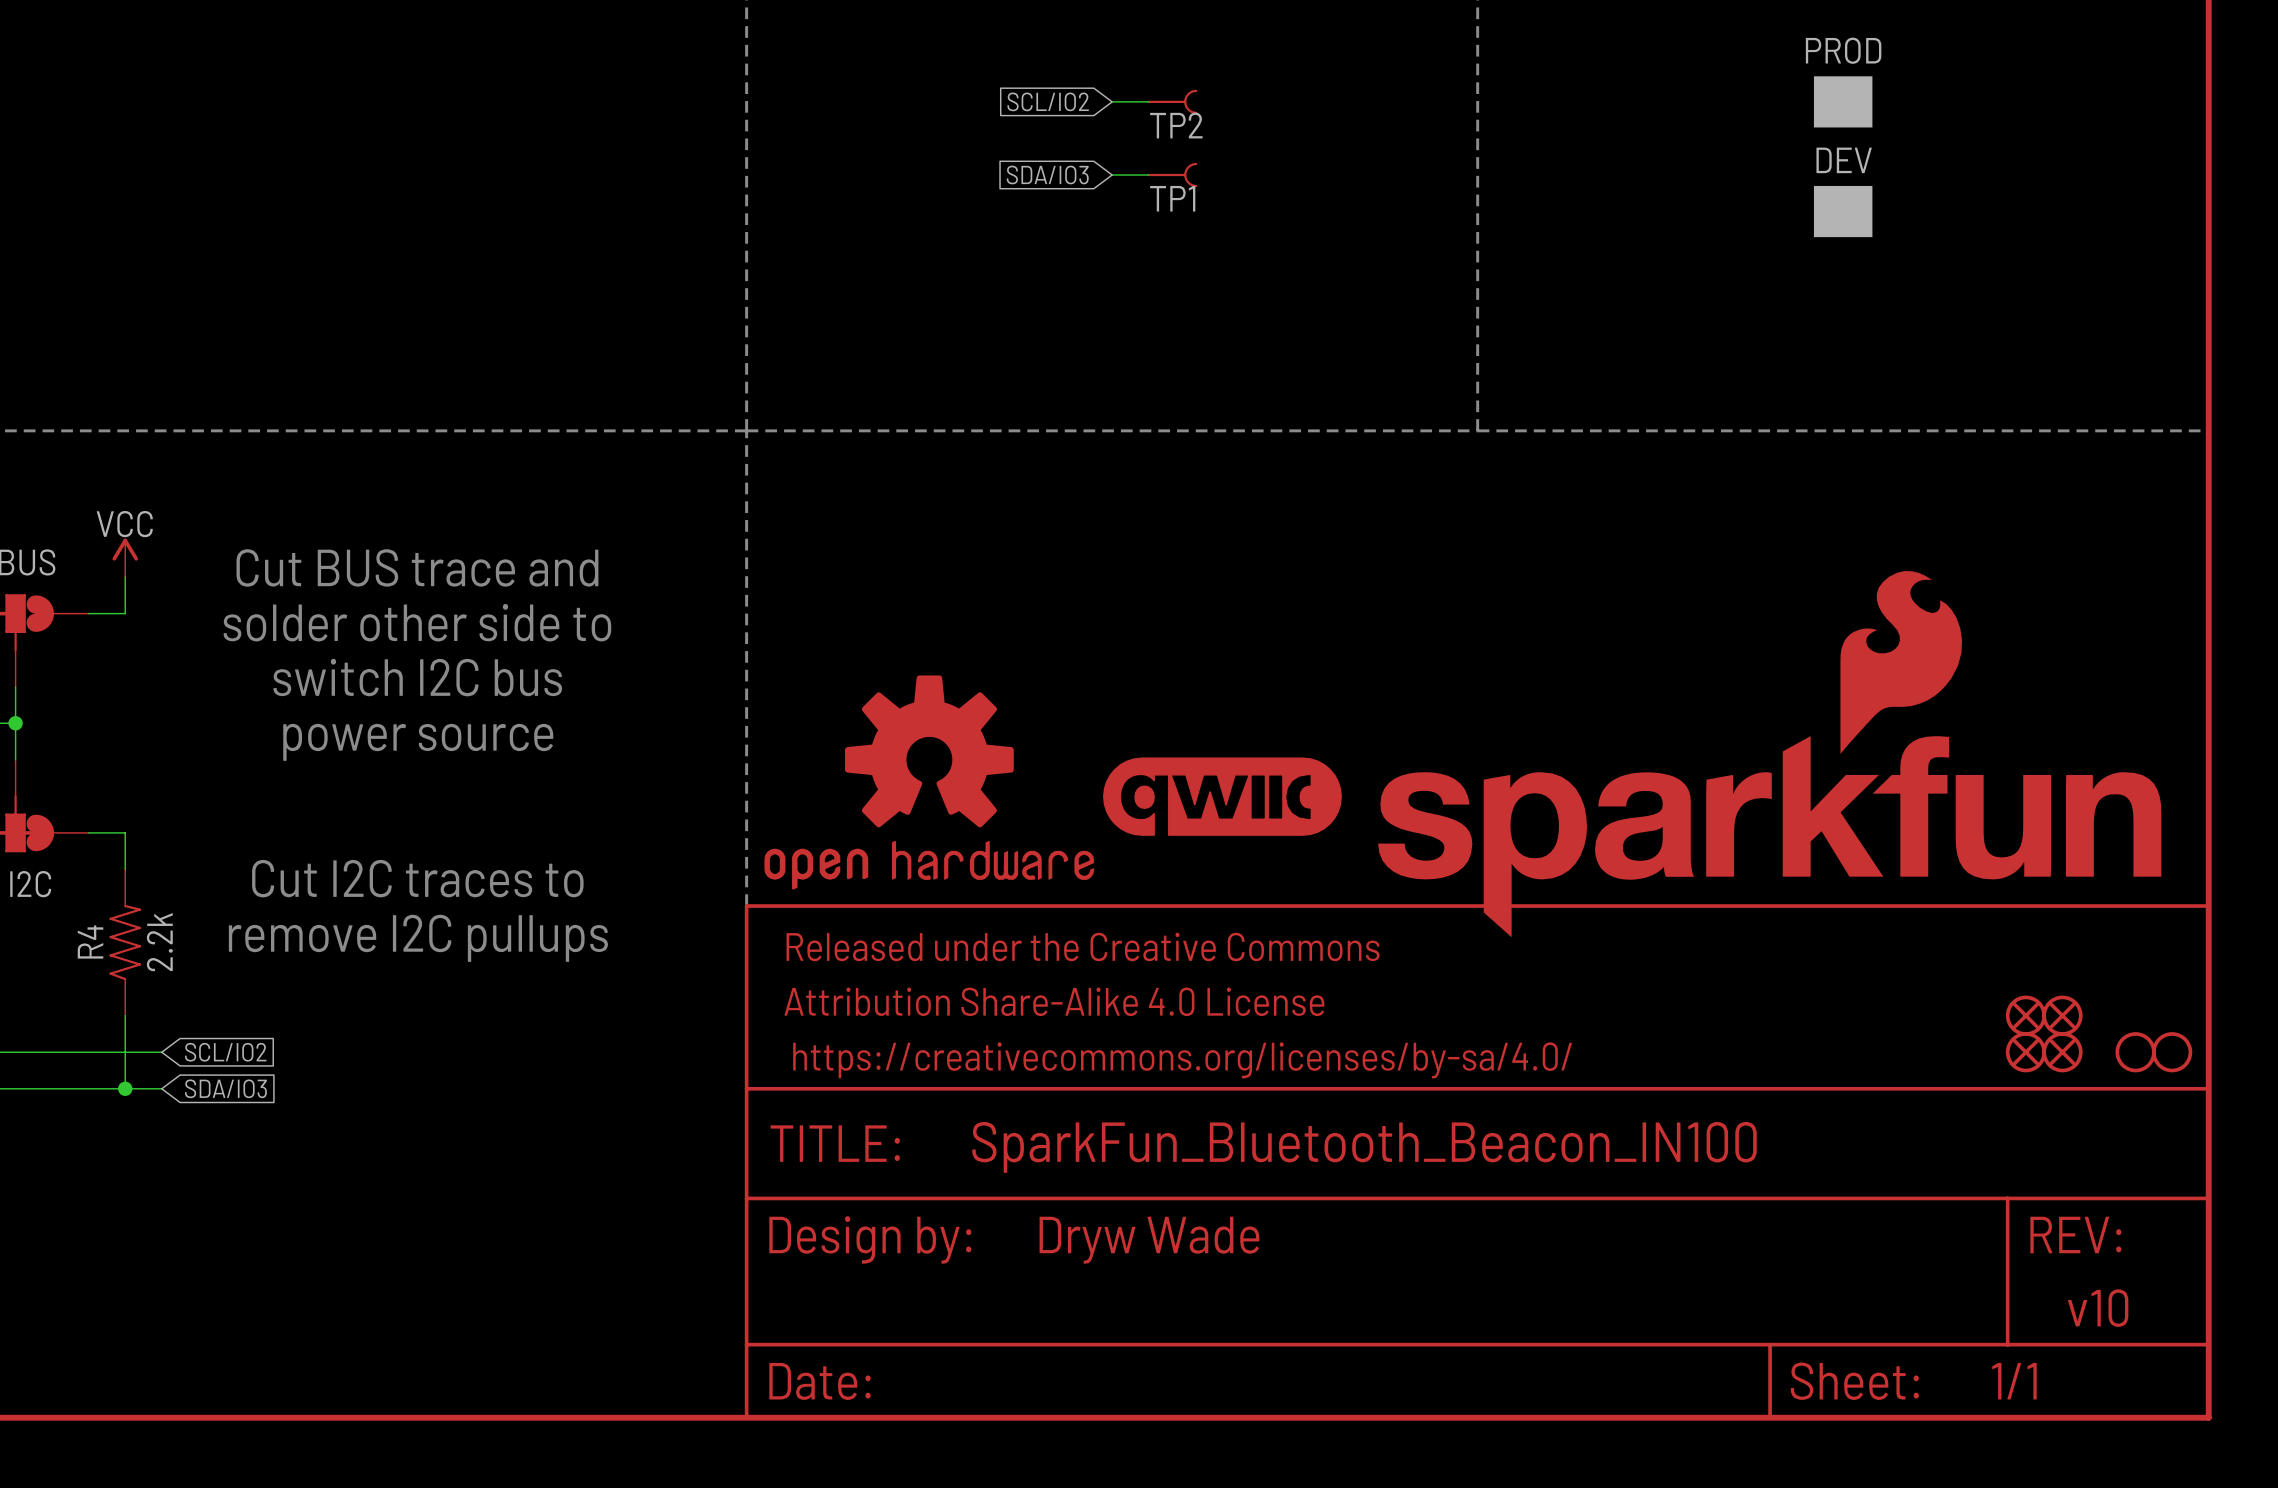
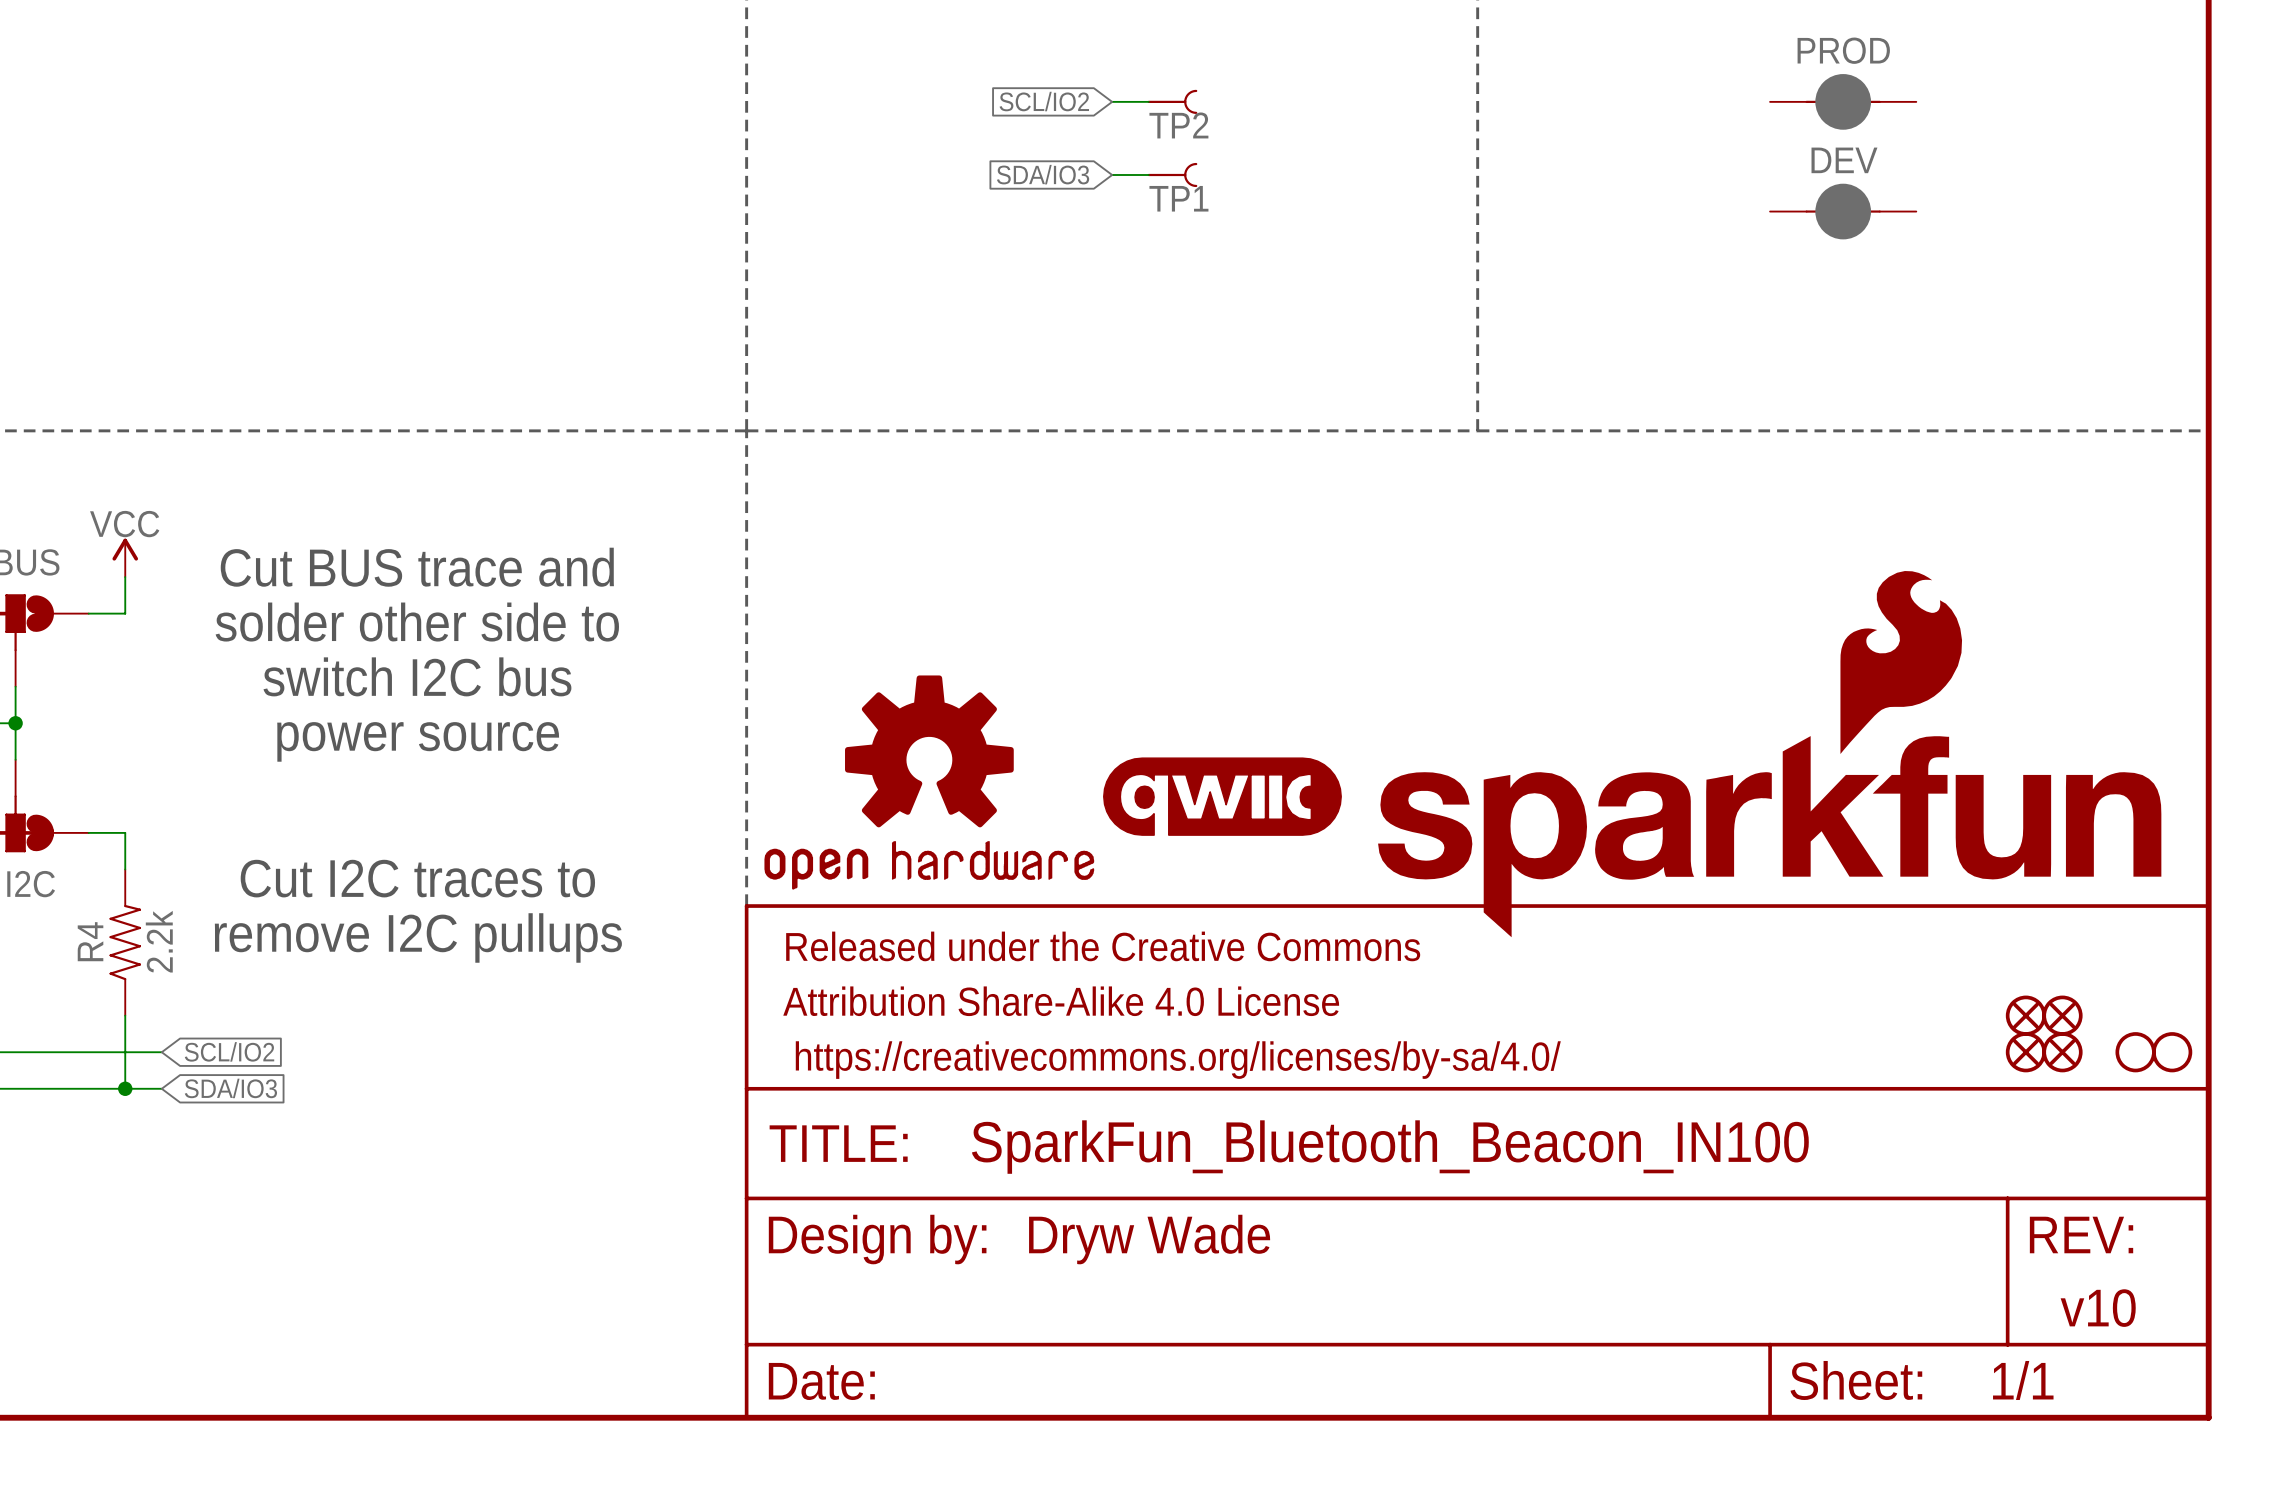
PROD symbol: [1813, 76, 1873, 128] -> [1770, 74, 1917, 130]
DEV symbol: [1813, 185, 1873, 238] -> [1770, 183, 1917, 240]

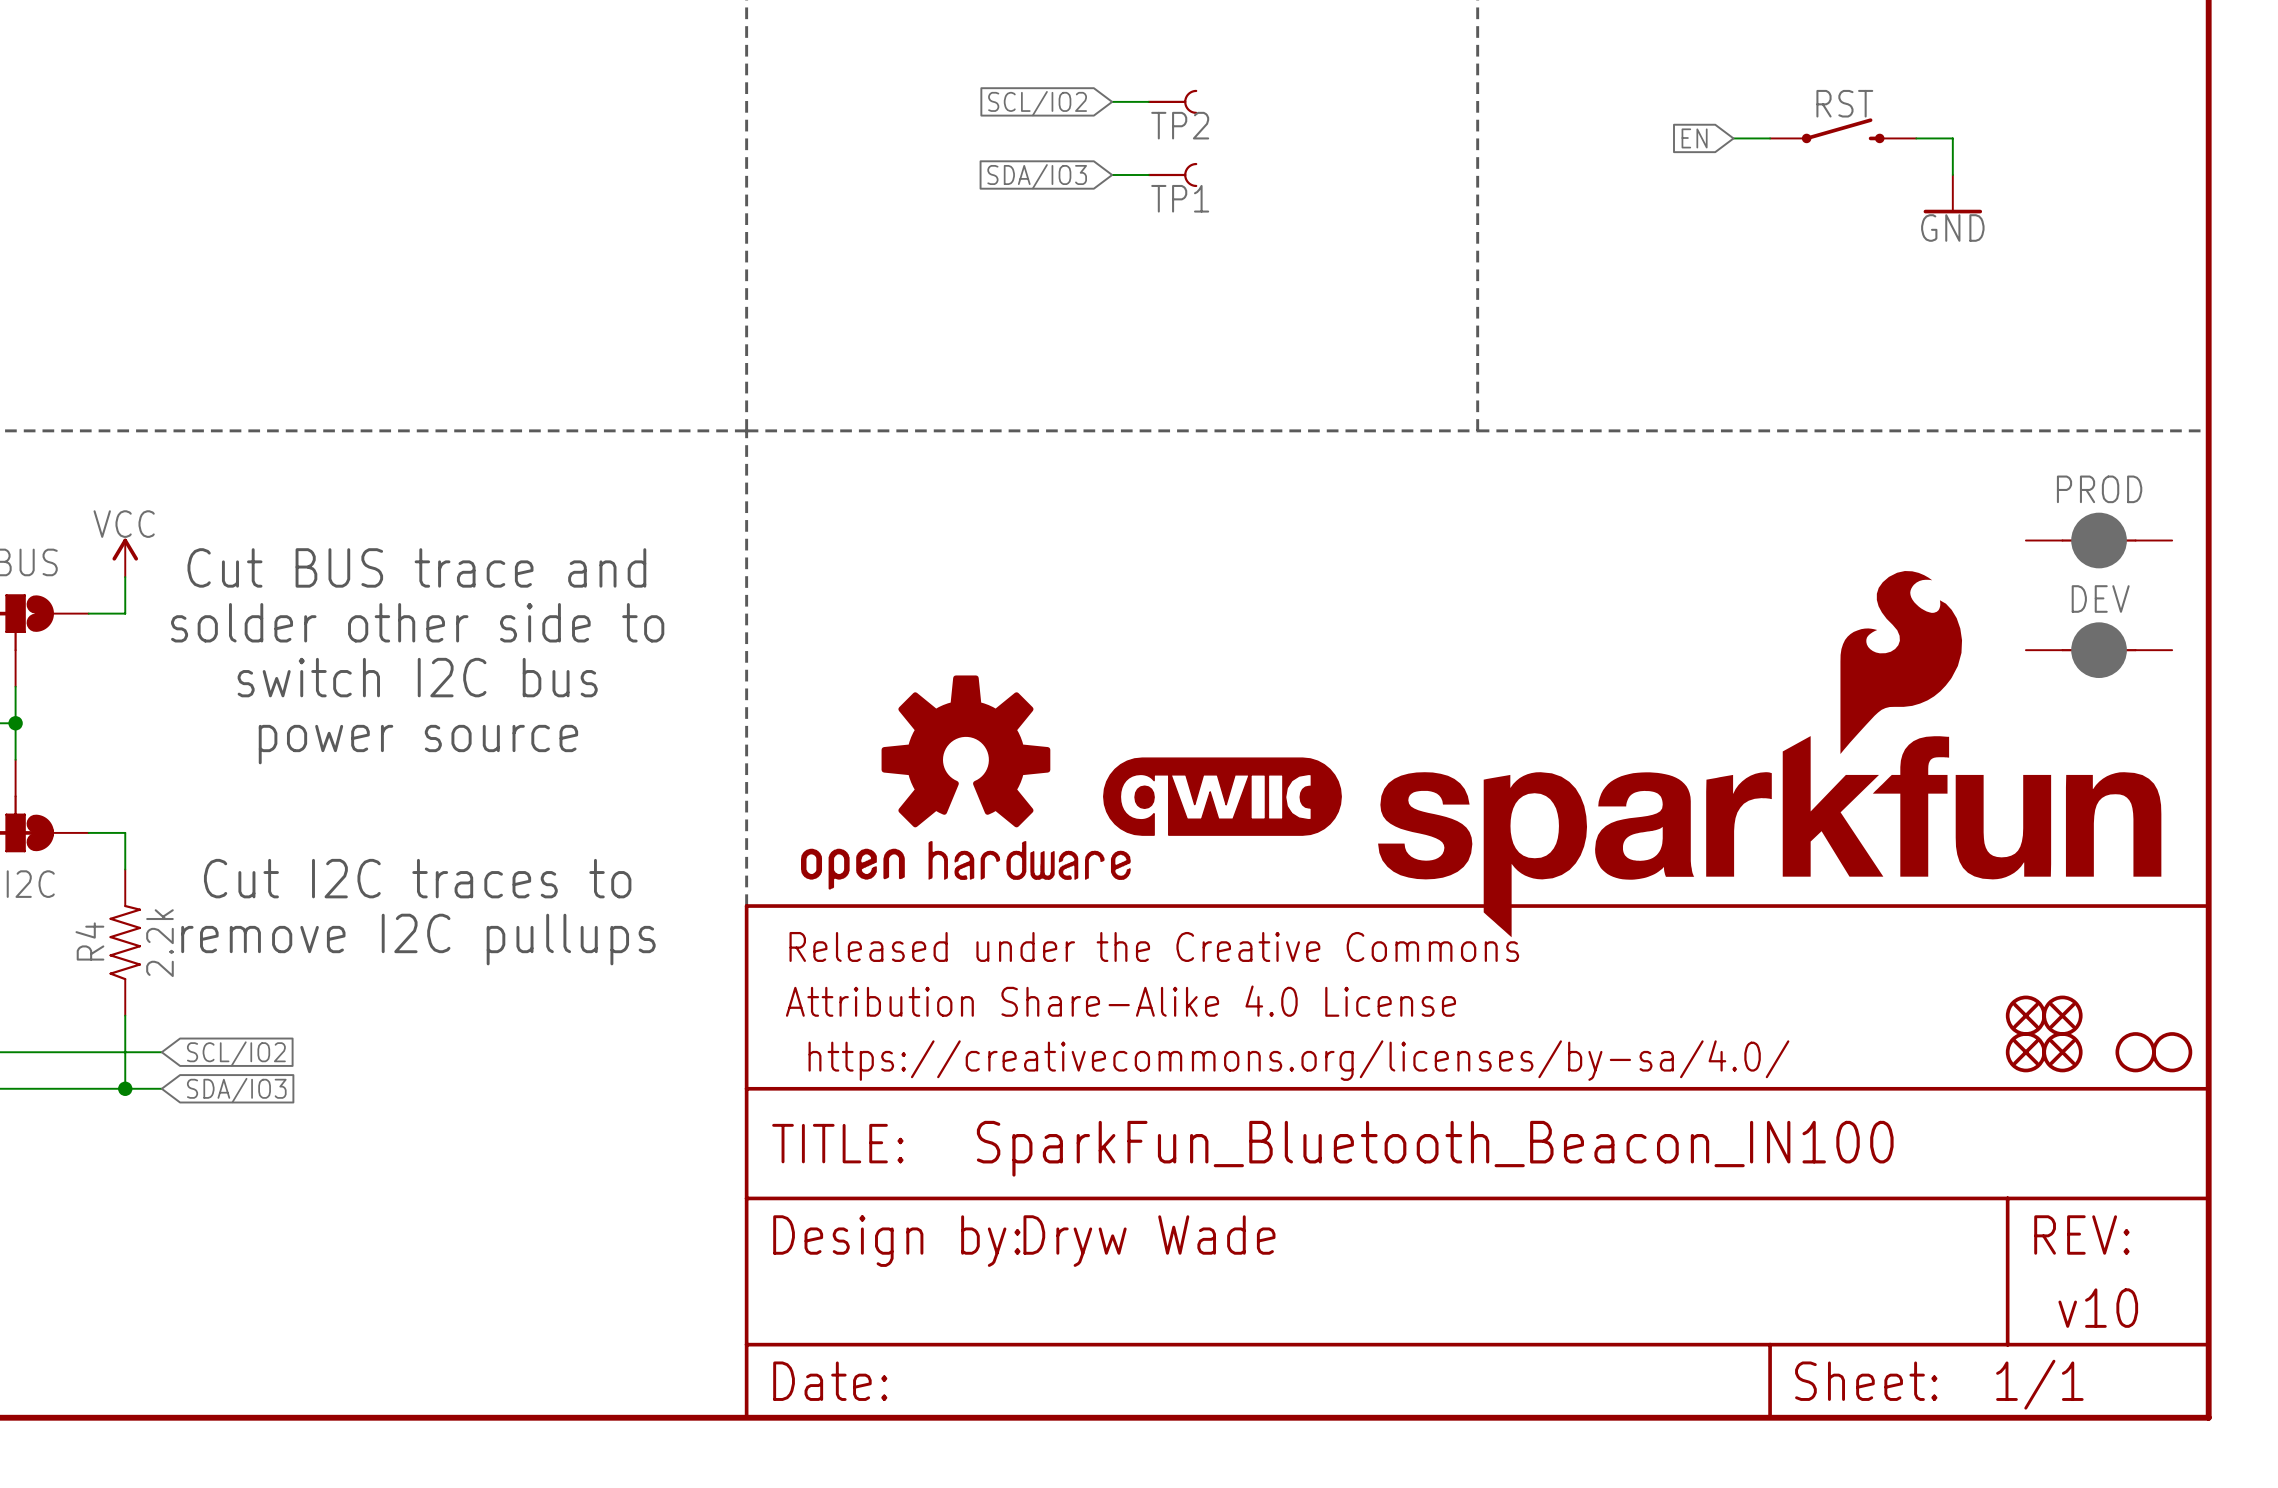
PROD: (1843, 101) -> none
RST: none -> (1843, 130)
global label: none -> EN (1694, 138)
wire: none -> (1733, 138) (1770, 138)
wire: none -> (1916, 138) (1952, 138) (1952, 174)
power symbol: none -> GND (1952, 194)
DEV: (1843, 211) -> none
PROD: none -> (2099, 540)
DEV: none -> (2099, 650)
part position: (929, 782) -> (965, 782)

